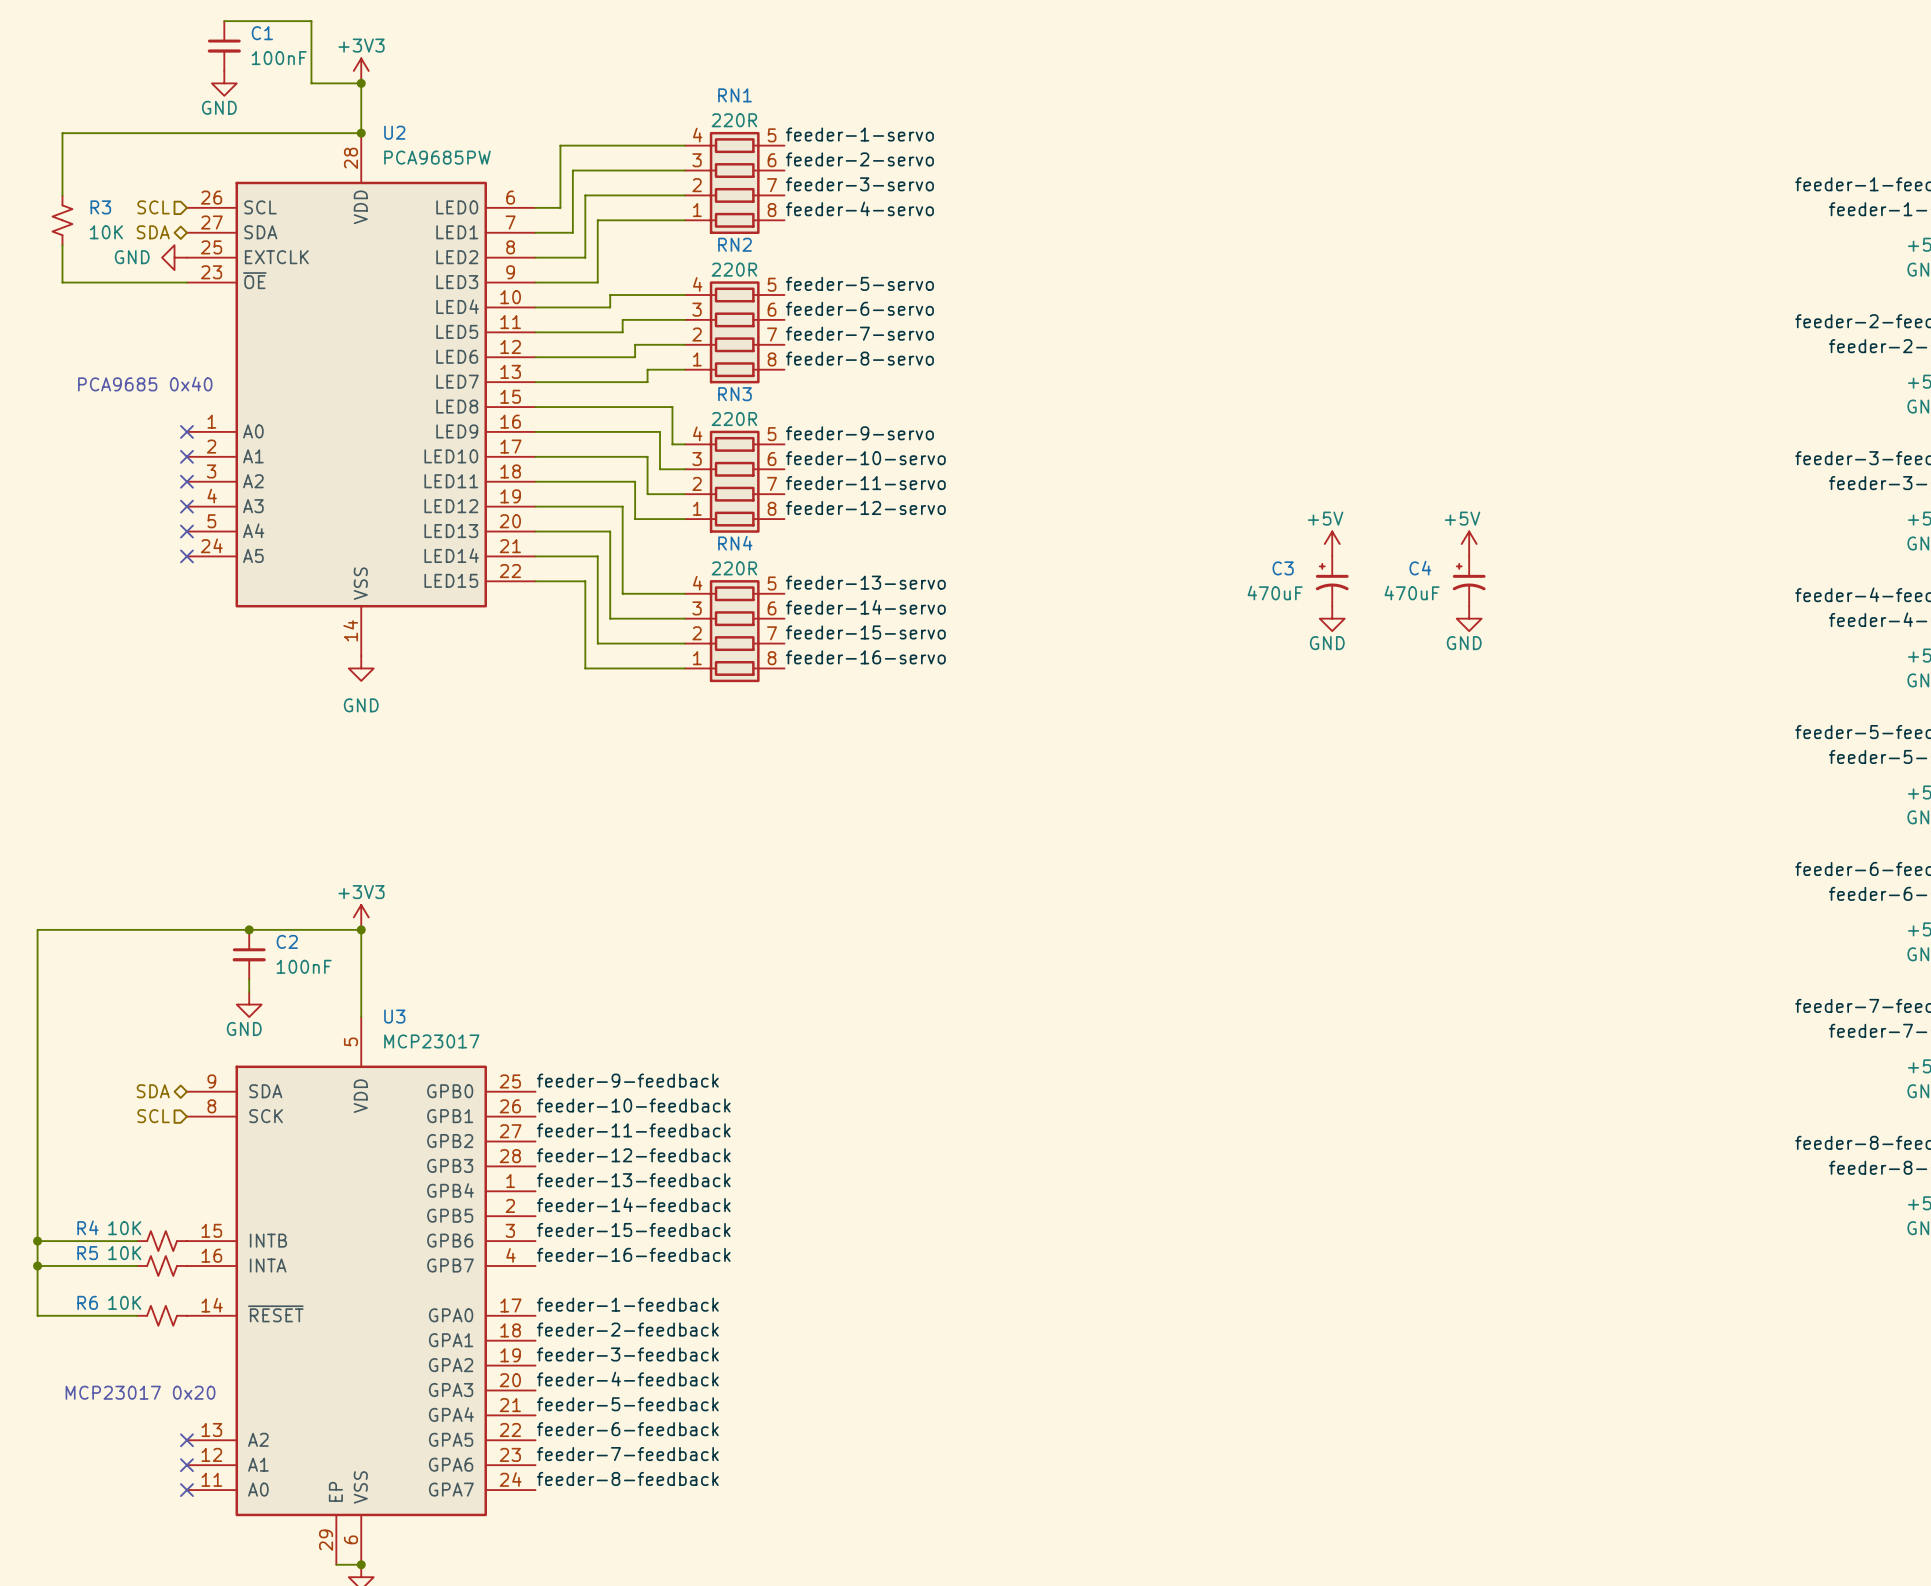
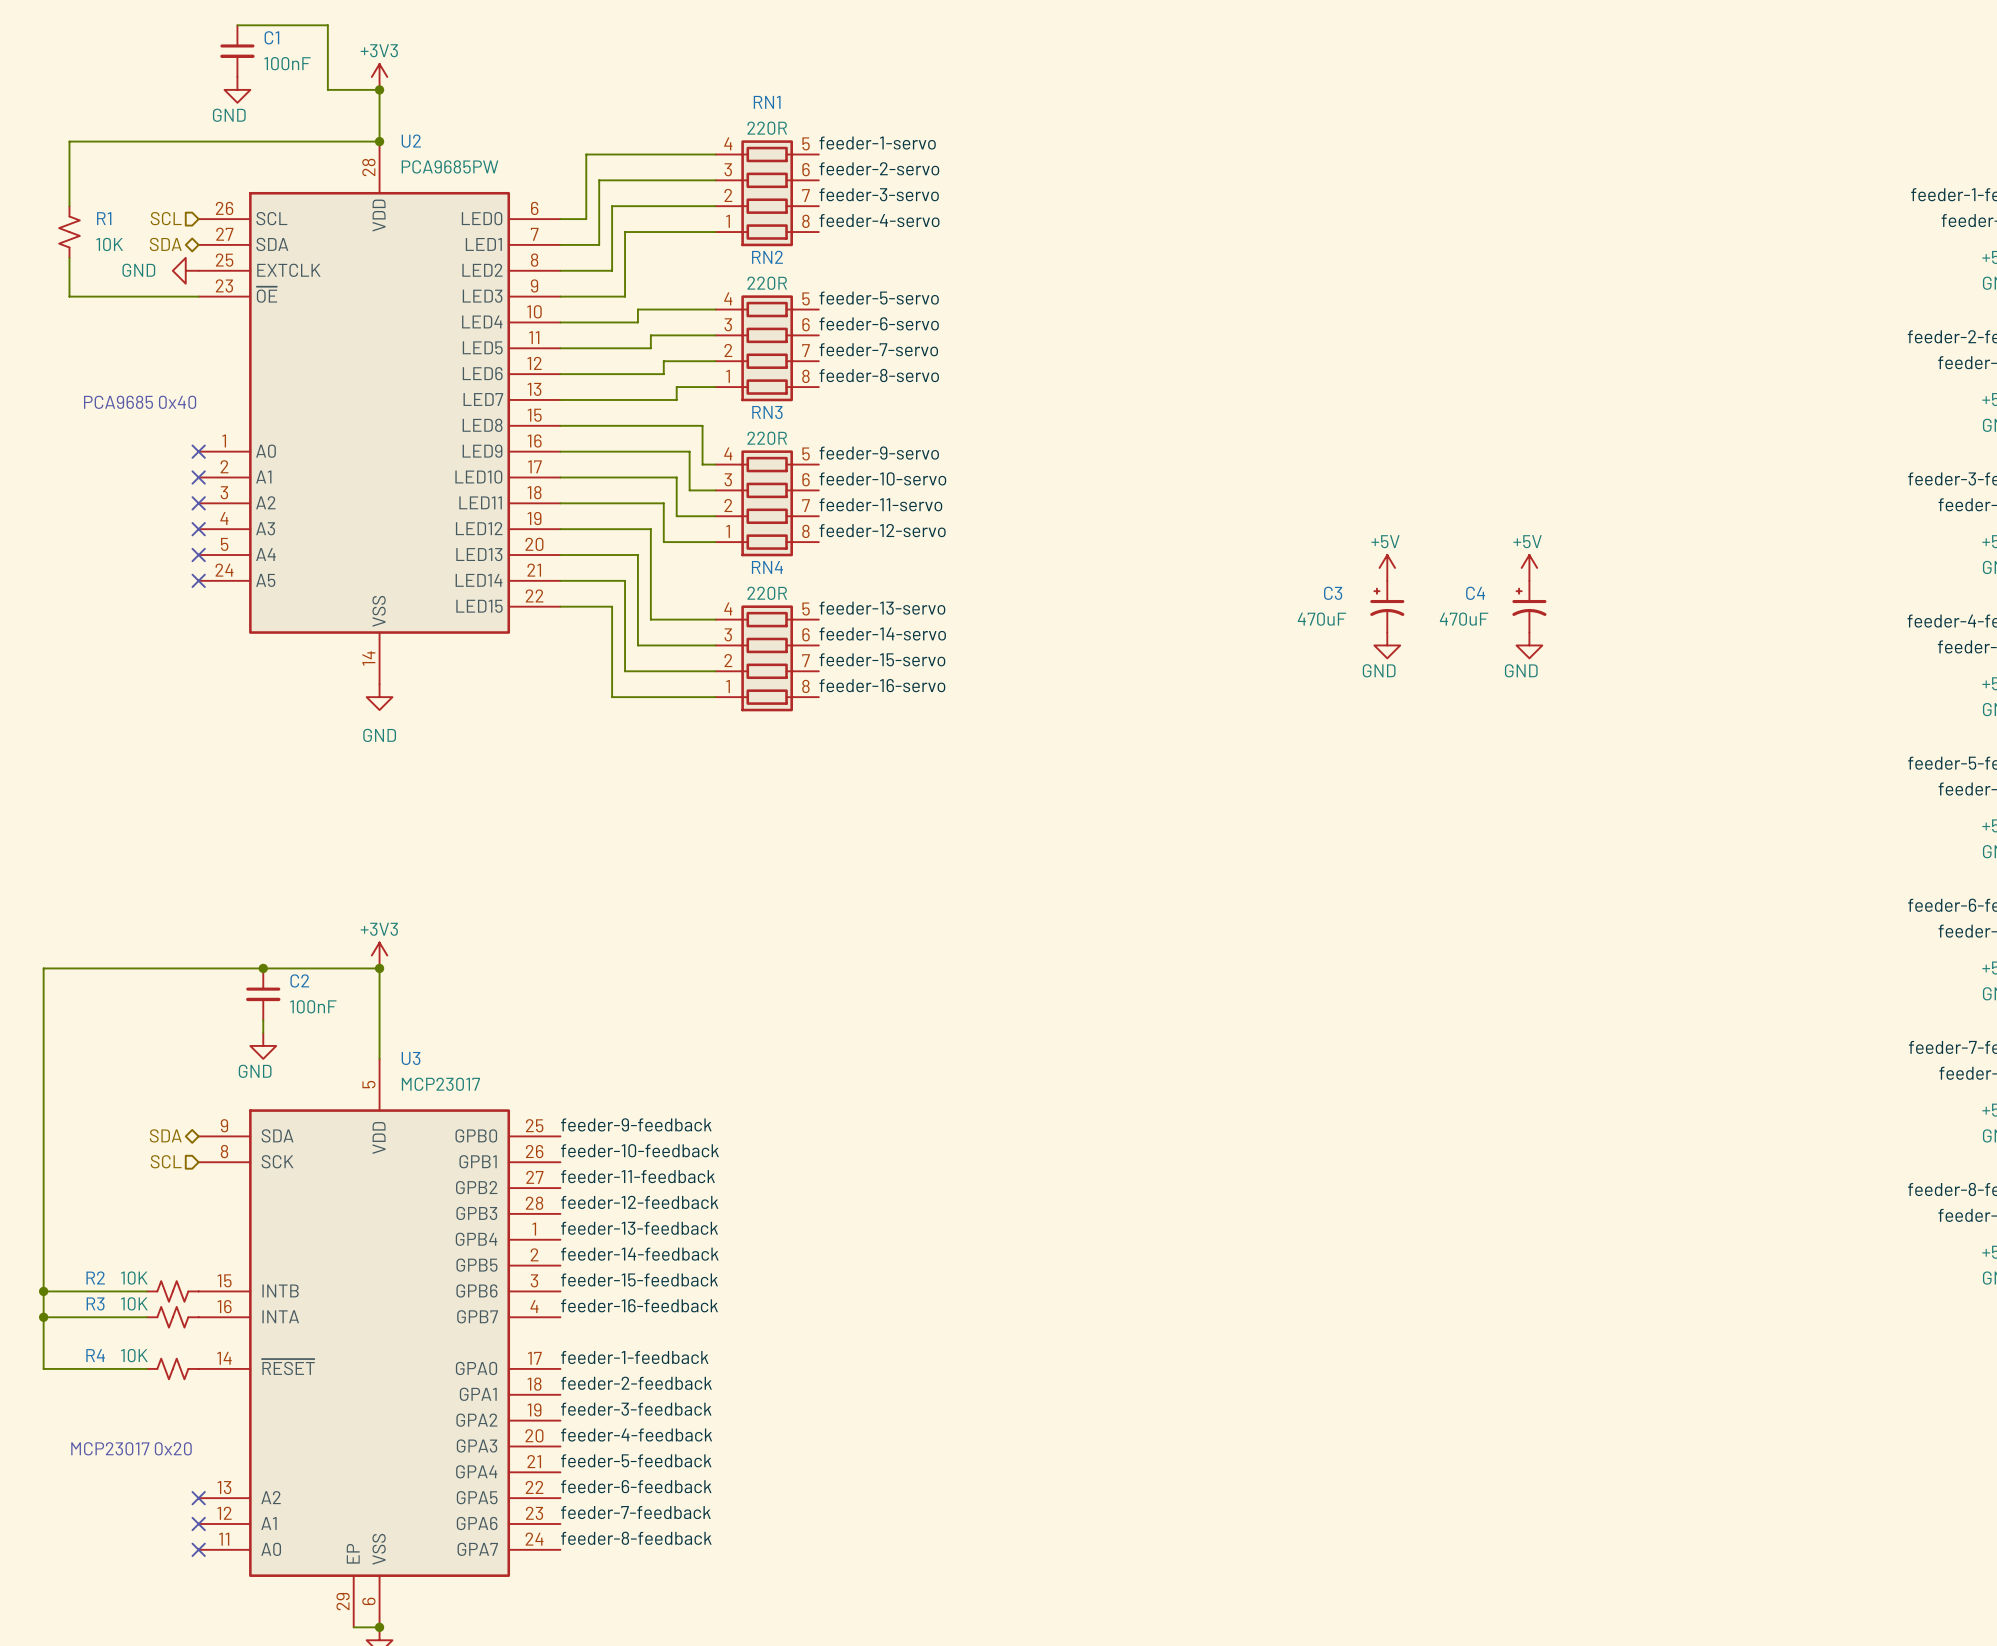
R3 name: R3 (100, 207) -> R1 (104, 218)
R4 name: R4 (87, 1227) -> R2 (95, 1277)
R5 name: R5 (87, 1253) -> R3 (95, 1303)
R6 name: R6 (87, 1302) -> R4 (95, 1355)

